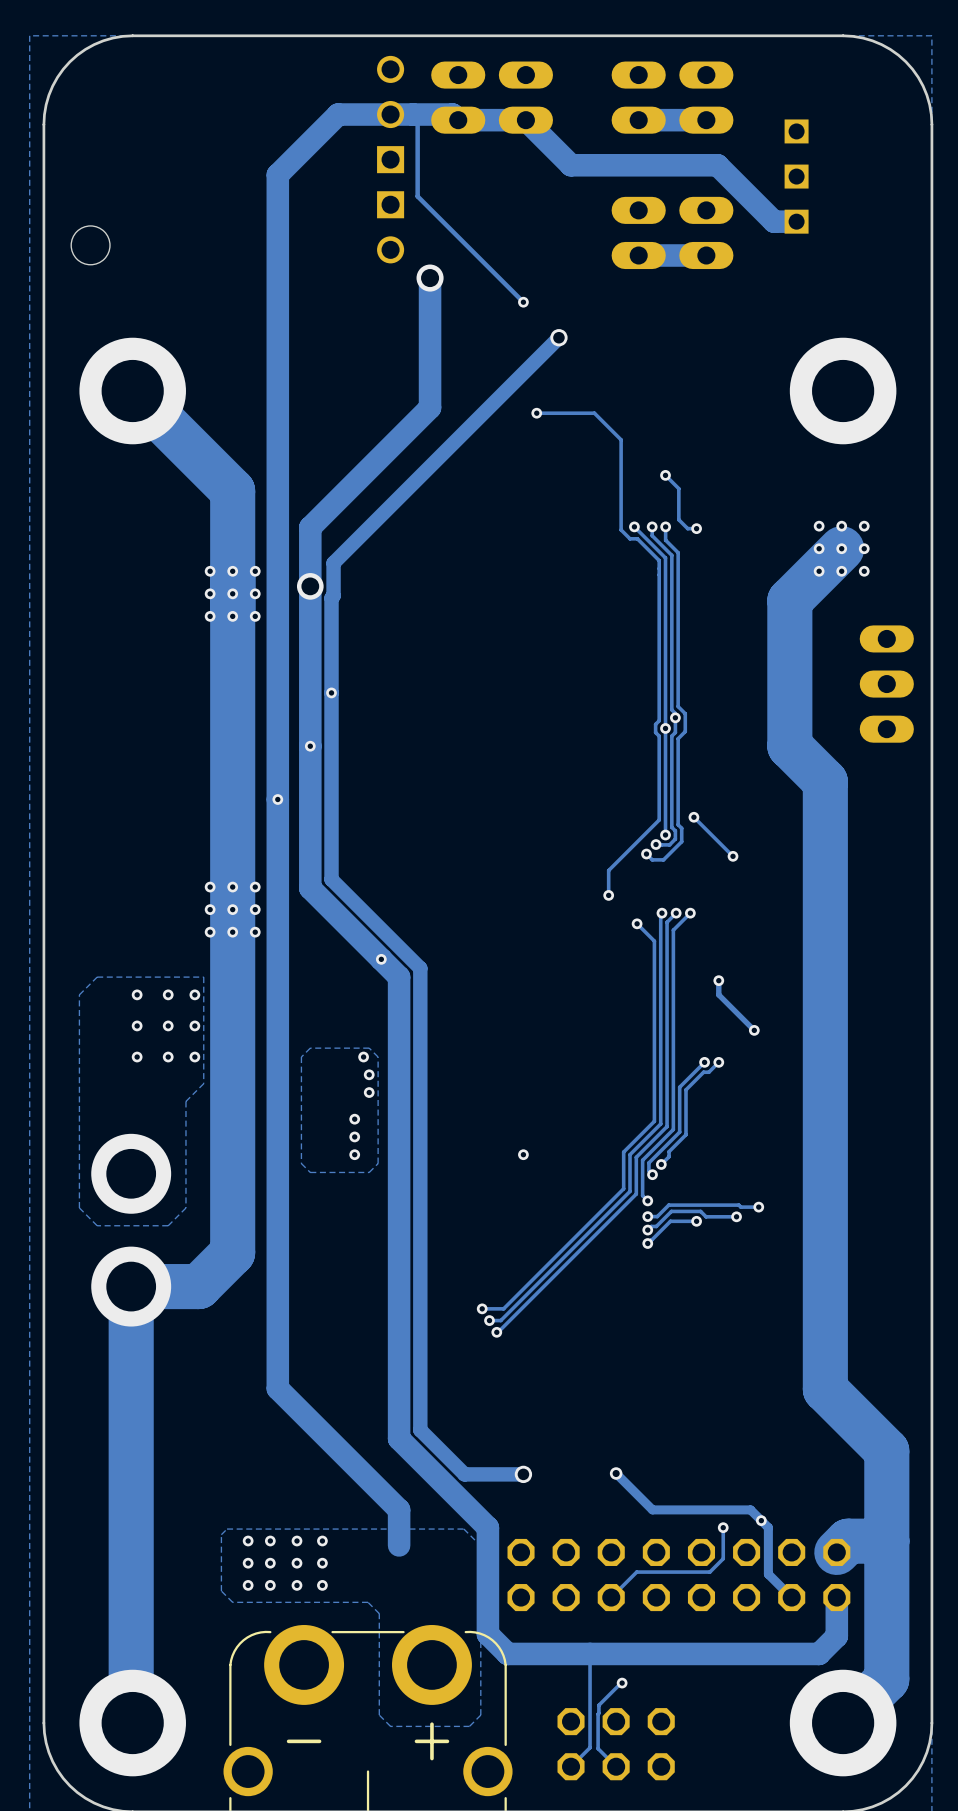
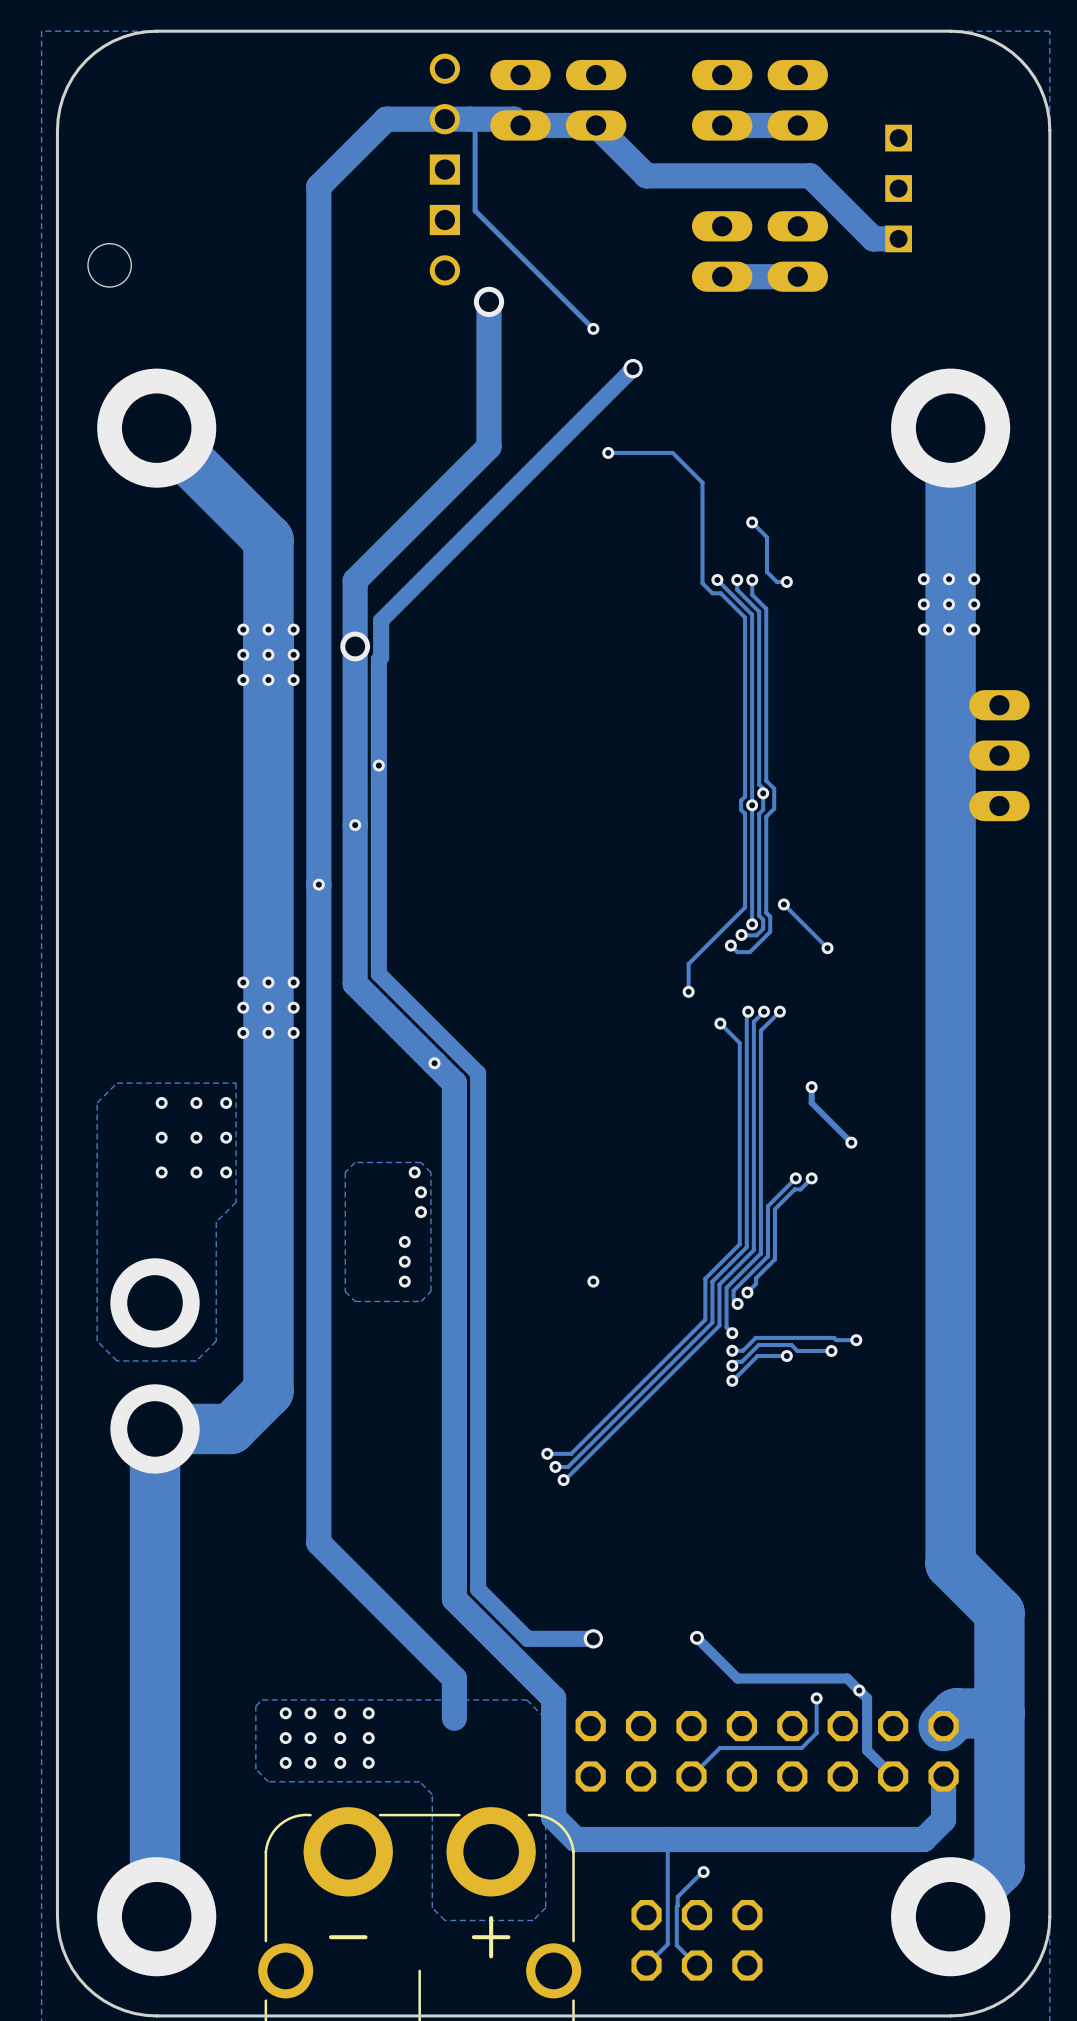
track: (841, 548) (789, 600) (789, 746) (825, 781) (825, 1389) (843, 1407) -> (950, 428) (950, 1563)

